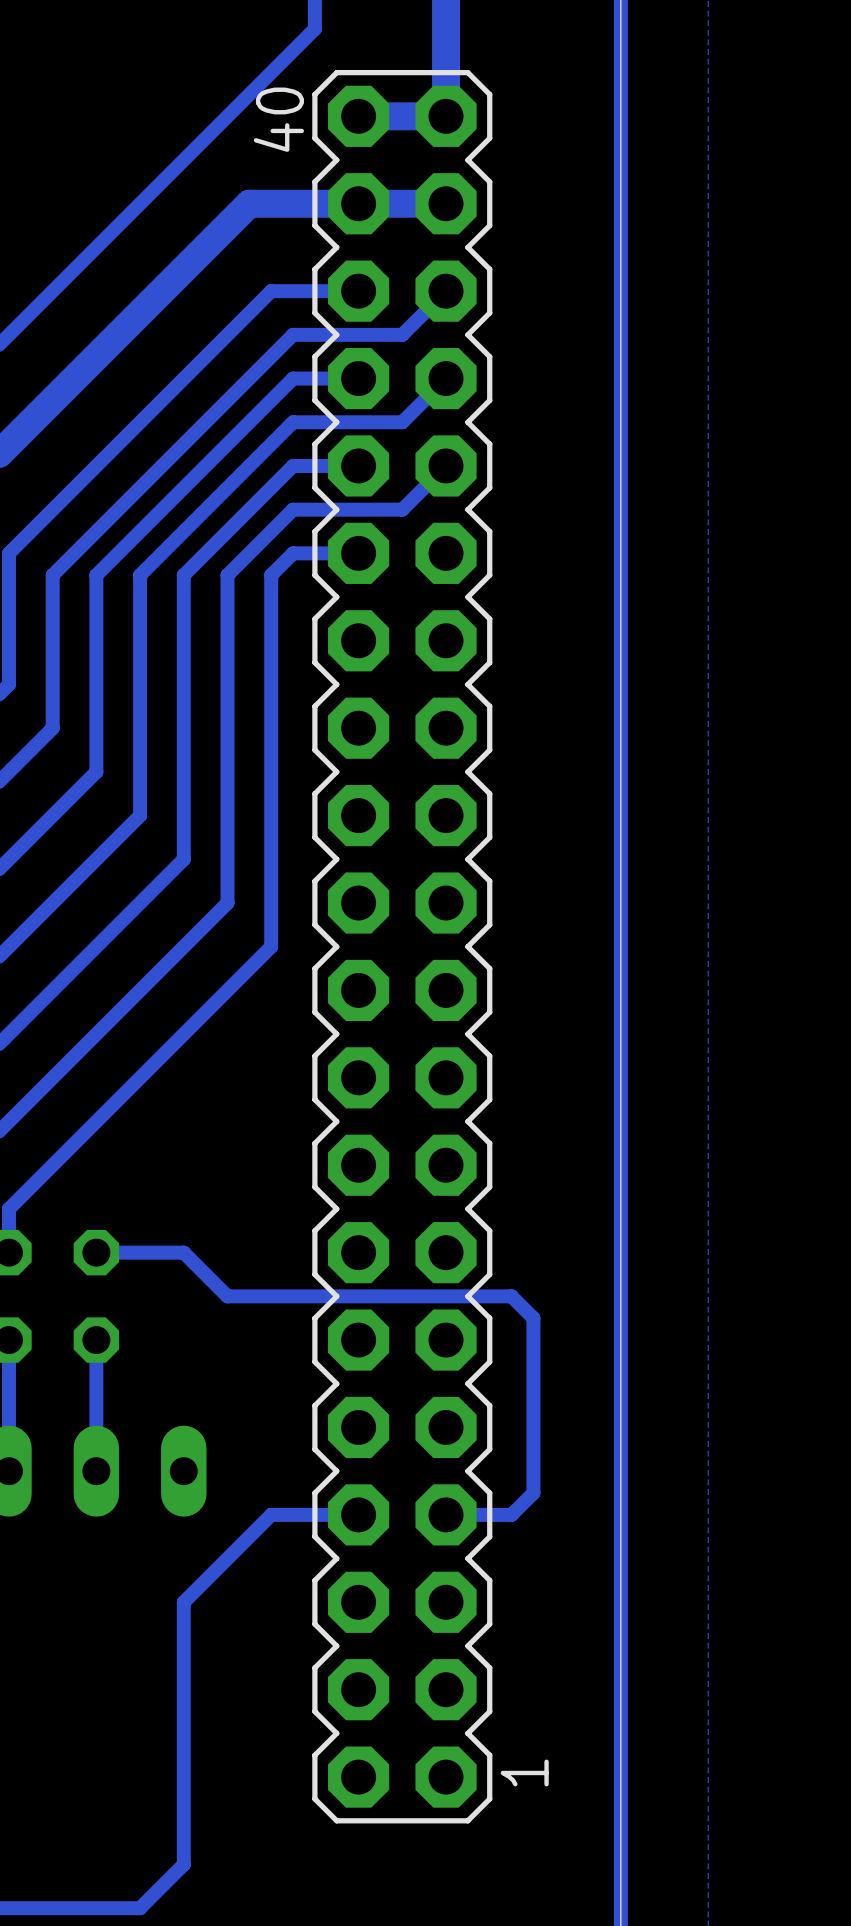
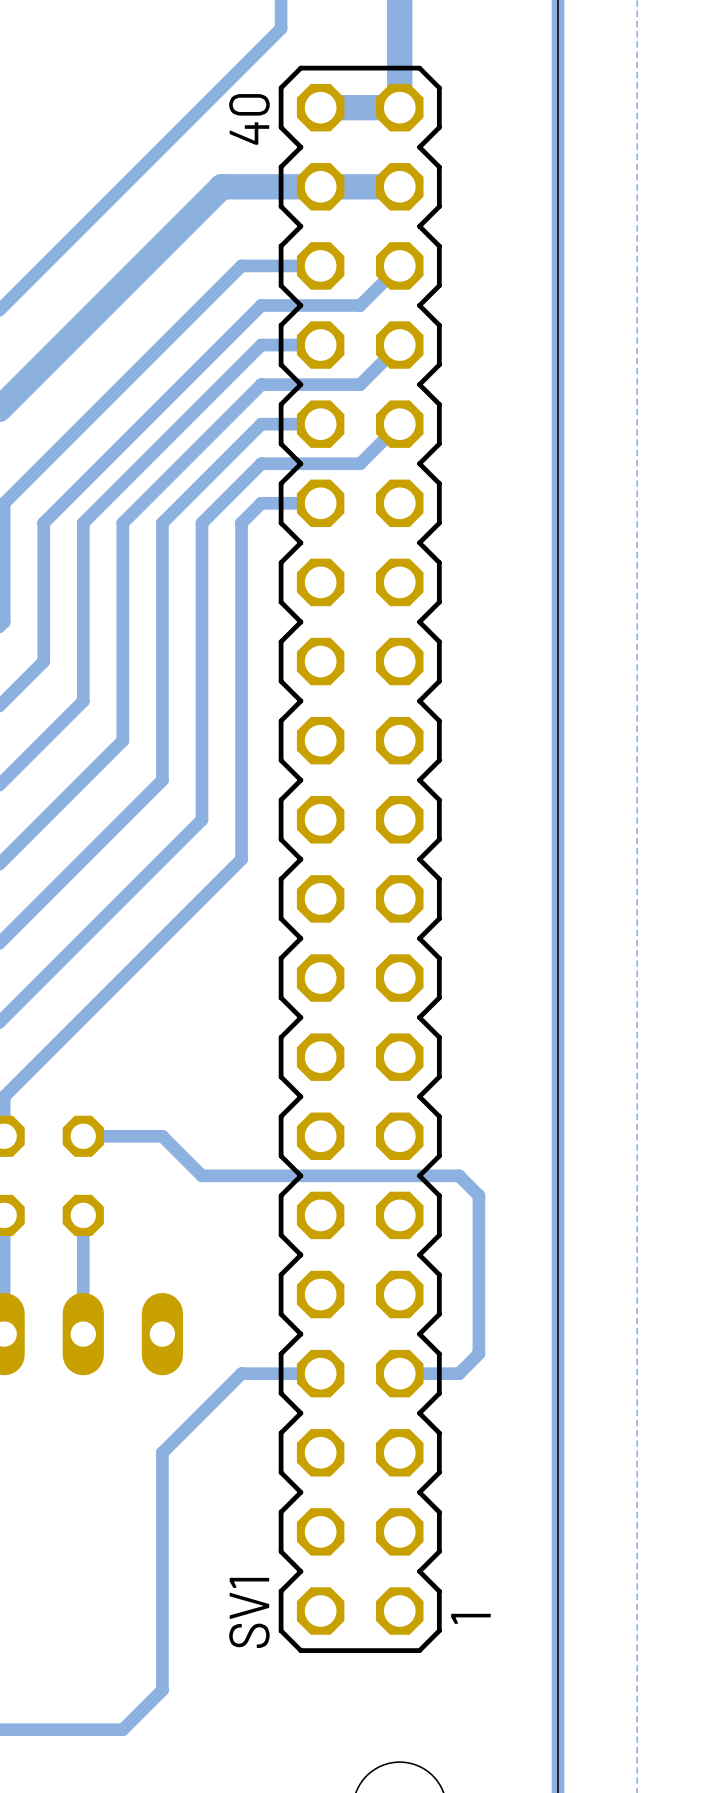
part: (402, 946) -> none
SV1: none -> (360, 859)

